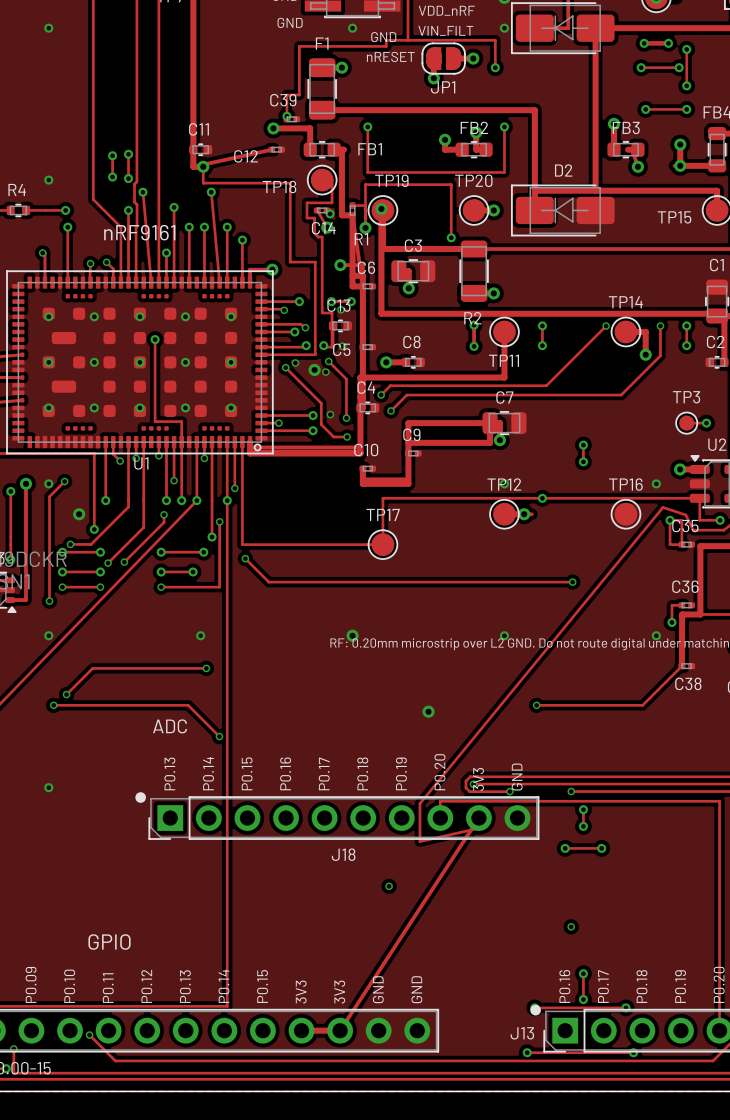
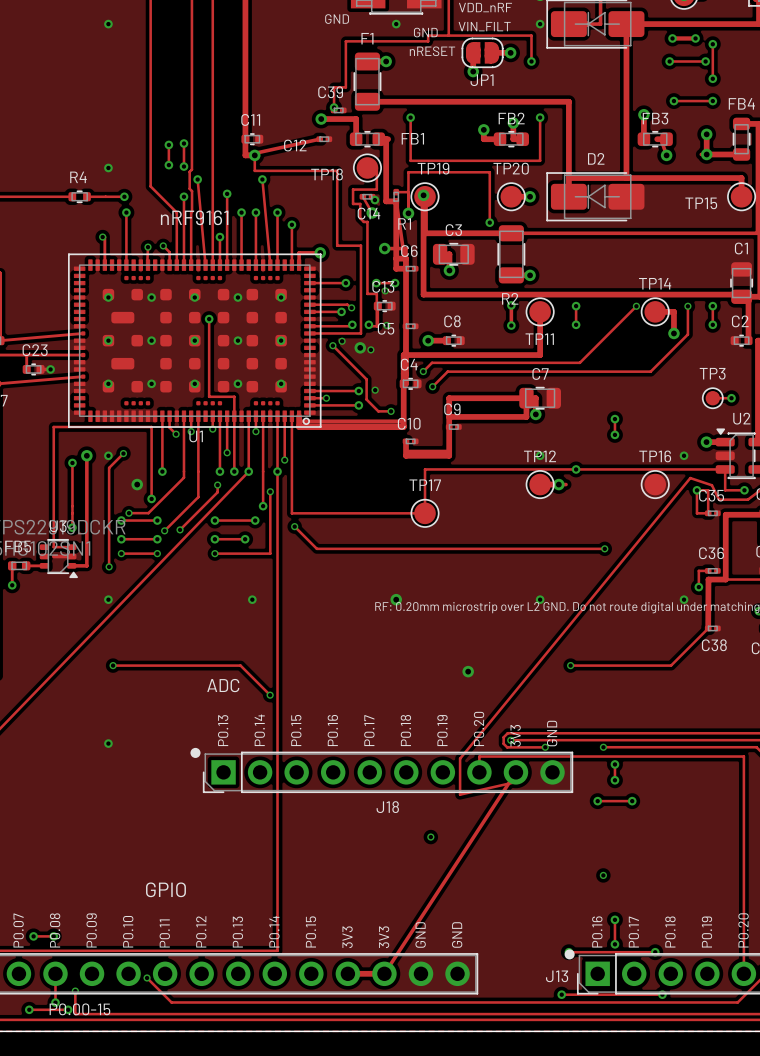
track: (261, 309) (284, 310) -> none
via: (284, 310) -> none
track: (328, 361) (346, 379) (346, 418) -> none
via: (328, 361) -> none
via: (346, 418) -> none
track: (206, 668) (92, 668) (66, 694) -> none
via: (206, 668) -> none
via: (66, 694) -> none

